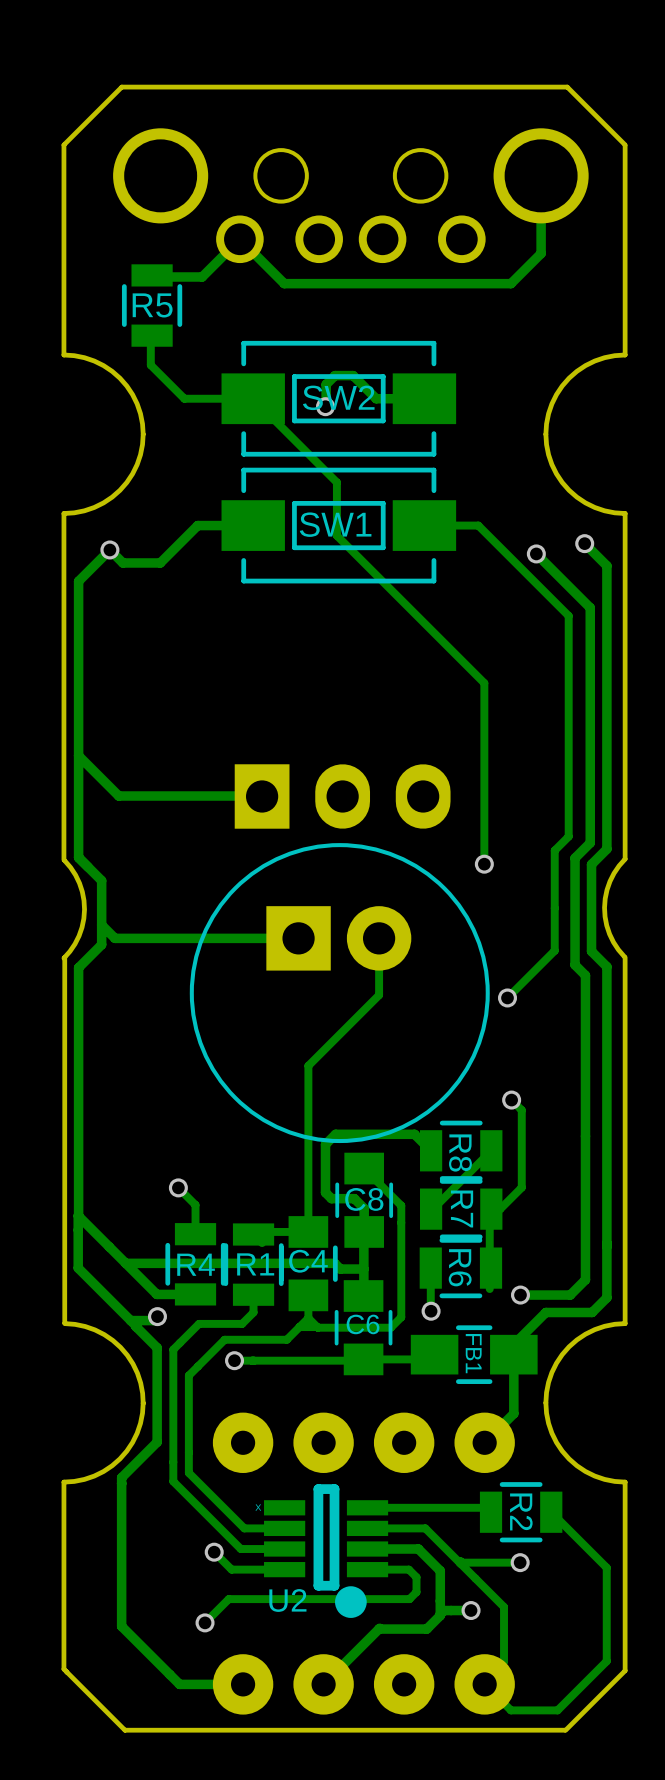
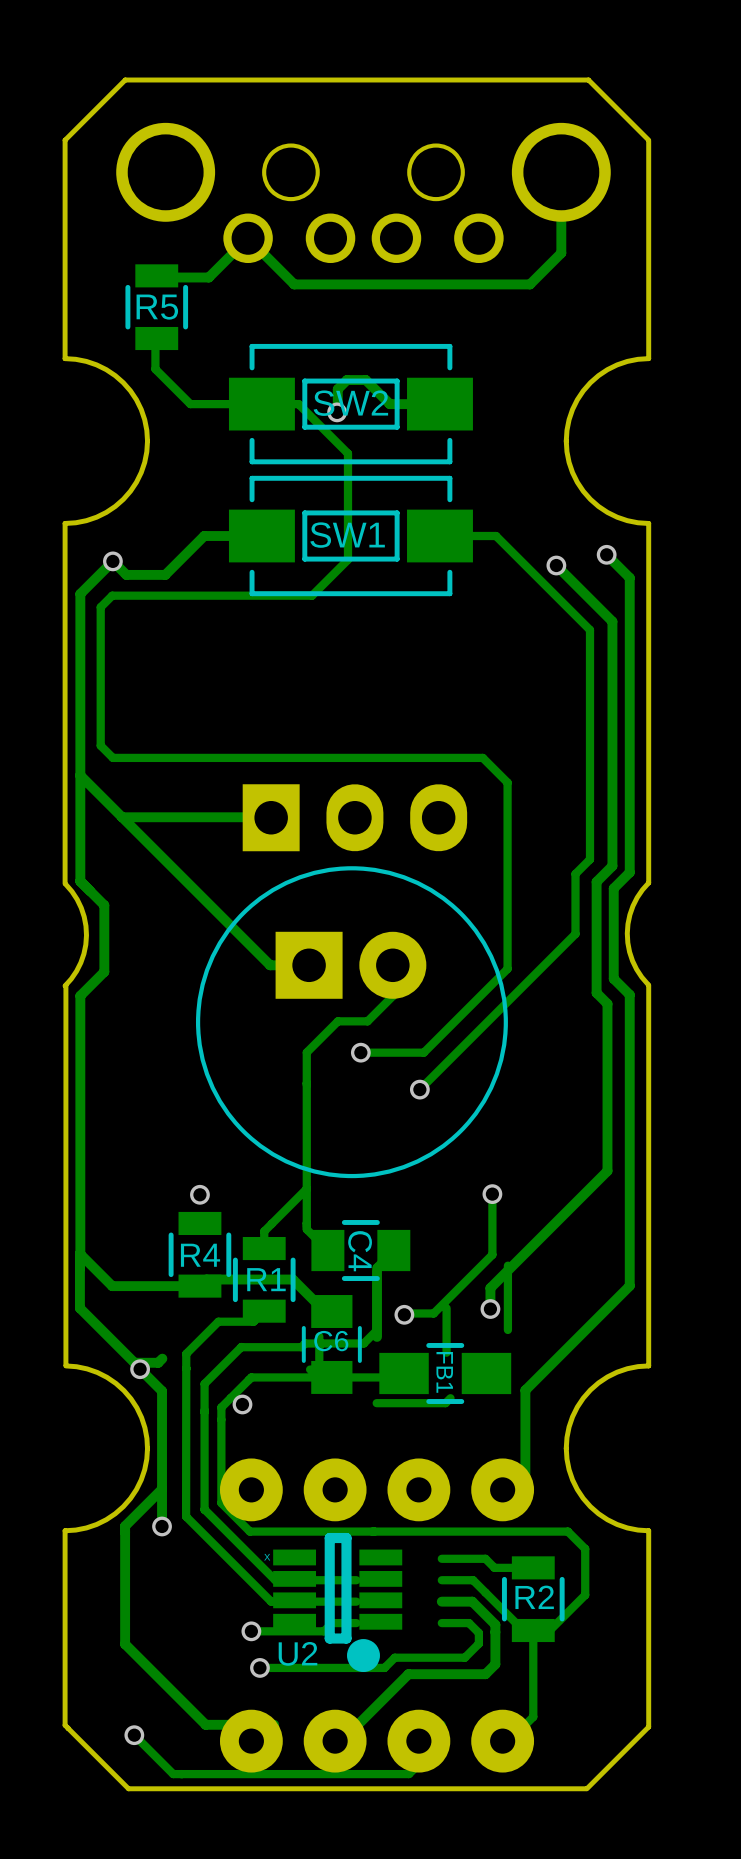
track: (253, 398) (336, 482) (336, 535) (484, 683) (484, 864) -> (261, 404) (298, 404) (347, 453) (347, 559) (312, 595) (112, 595) (100, 607) (100, 745) (112, 757) (482, 757) (507, 782) (507, 968) (423, 1052) (360, 1052)
via: (484, 864) -> none
track: (554, 908) (554, 950) (507, 997) -> (575, 933) (419, 1089)
track: (101, 925) (114, 938) (261, 938) -> (122, 817) (270, 965)
track: (379, 968) (379, 995) (308, 1065) (308, 1231) (256, 1231) (253, 1234) (262, 1243) -> (392, 996) (367, 1021) (337, 1021) (306, 1052) (306, 1229) (327, 1250)
via: (507, 997) -> none
via: none -> (360, 1052)
via: none -> (419, 1089)
track: (511, 1100) (521, 1110) (521, 1187) (500, 1209) (491, 1209) -> none
via: (511, 1100) -> none
track: (585, 1136) (585, 1279) (570, 1295) (520, 1295) -> (607, 1171) (490, 1288) (490, 1309)
track: (431, 1150) (414, 1134) (335, 1134) (325, 1144) (325, 1192) (331, 1198) (354, 1198) (364, 1208) (364, 1231) -> none
R8: (461, 1150) -> none
track: (491, 1150) (431, 1209) -> none
track: none -> (306, 1188) (264, 1231) (264, 1248)
track: none -> (492, 1194) (492, 1254) (433, 1313) (404, 1314)
via: none -> (492, 1194)
track: (364, 1168) (401, 1205) (401, 1317) (390, 1327) (317, 1327) (308, 1318) (286, 1339) (224, 1339) (188, 1375) (188, 1472) (244, 1528) (284, 1528) -> none
track: (178, 1187) (195, 1205) (195, 1234) -> none
via position: (178, 1187) -> (199, 1194)
C8: (364, 1200) -> none
R7: (461, 1209) -> none
track: none -> (393, 1250) (376, 1267) (376, 1330) (363, 1343) (305, 1343) (301, 1347) (241, 1347)
track: (109, 1246) (156, 1294) (195, 1294) -> (112, 1286) (199, 1286) (206, 1279) (292, 1279) (324, 1311) (331, 1311)
track: (606, 1246) (606, 1297) (592, 1312) (545, 1312) (513, 1344) (513, 1413) (484, 1442) -> (629, 1285) (525, 1390) (525, 1473)
track: (125, 1263) (334, 1263) (340, 1269) (363, 1269) -> none
C4 rotation: 0° (308, 1263) -> 90° clockwise (360, 1250)
C4 position: (308, 1263) -> (360, 1250)
R4 position: (195, 1264) -> (199, 1254)
R1 position: (253, 1264) -> (264, 1279)
R6: (460, 1268) -> none
via: none -> (490, 1309)
track: none -> (264, 1311) (253, 1321) (218, 1321) (186, 1353) (186, 1368)
via: none -> (404, 1314)
track: (253, 1294) (253, 1312) (242, 1323) (199, 1323) (173, 1349) (173, 1481) (240, 1549) (284, 1549) -> none
via: (520, 1295) -> none
track: none -> (241, 1346) (204, 1383) (204, 1509)
via: (431, 1311) -> none
via position: (157, 1316) -> (140, 1369)
track: none -> (186, 1368) (186, 1516) (271, 1601) (356, 1601)
C6 position: (363, 1327) -> (331, 1344)
track: none -> (404, 1373) (400, 1377) (251, 1377) (221, 1407) (221, 1503) (249, 1531) (567, 1531) (585, 1548) (585, 1595) (549, 1630) (523, 1630) (473, 1580) (441, 1580)
FB1 position: (474, 1354) -> (445, 1373)
track: (367, 1356) (363, 1360) (234, 1360) -> none
track: none -> (162, 1489) (162, 1526)
track: none -> (204, 1509) (275, 1580) (356, 1580)
via: none -> (162, 1526)
track: (367, 1507) (486, 1507) (491, 1512) -> none
track: none -> (441, 1558) (485, 1558) (494, 1567) (533, 1567)
R2 rotation: 0° (521, 1512) -> 90° clockwise (533, 1599)
track: (551, 1512) (606, 1567) (606, 1661) (557, 1710) (510, 1710) (484, 1684) -> none
track: (367, 1528) (425, 1528) (504, 1607) (504, 1661) (484, 1680) (484, 1684) -> none
track: (367, 1549) (418, 1549) (440, 1570) (440, 1615) (426, 1629) (378, 1629) -> none
track: none -> (441, 1601) (472, 1601) (495, 1624) (495, 1664) (485, 1674) (408, 1674) (357, 1724)
track: (214, 1552) (231, 1569) (284, 1569) -> none
via: (214, 1552) -> none
track: (520, 1562) (459, 1562) (460, 1561) (460, 1563) -> none
via: (520, 1562) -> none
track: (367, 1569) (408, 1569) (416, 1577) (416, 1592) (409, 1599) (228, 1599) (205, 1622) -> none
track: none -> (356, 1623) (332, 1623) (323, 1631) (251, 1631)
track: none -> (441, 1623) (469, 1623) (478, 1632) (478, 1643) (464, 1657) (394, 1657) (384, 1667) (259, 1667)
via: none -> (251, 1631)
track: none -> (533, 1630) (533, 1716) (525, 1724)
track: (121, 1591) (121, 1626) (179, 1684) (243, 1684) -> (125, 1644) (205, 1724) (274, 1724)
track: (471, 1610) (444, 1610) (440, 1614) -> none
via: (471, 1610) -> none
via: none -> (259, 1667)
via: (205, 1622) -> none
track: (379, 1628) (323, 1684) -> none
track: none -> (441, 1724) (441, 1741) (408, 1774) (173, 1774) (134, 1735)
via: none -> (134, 1735)

